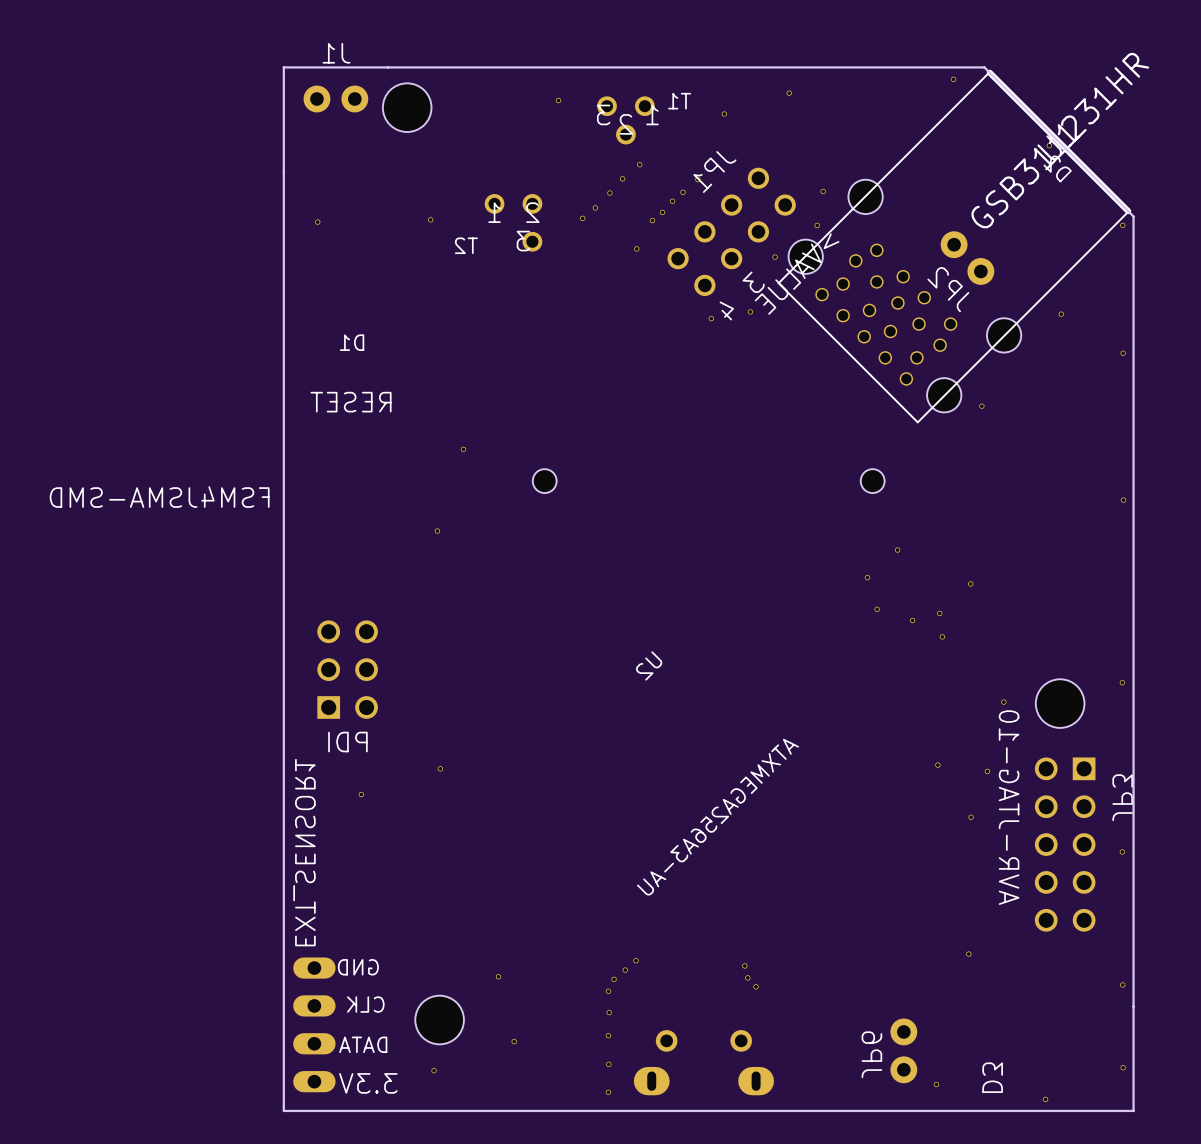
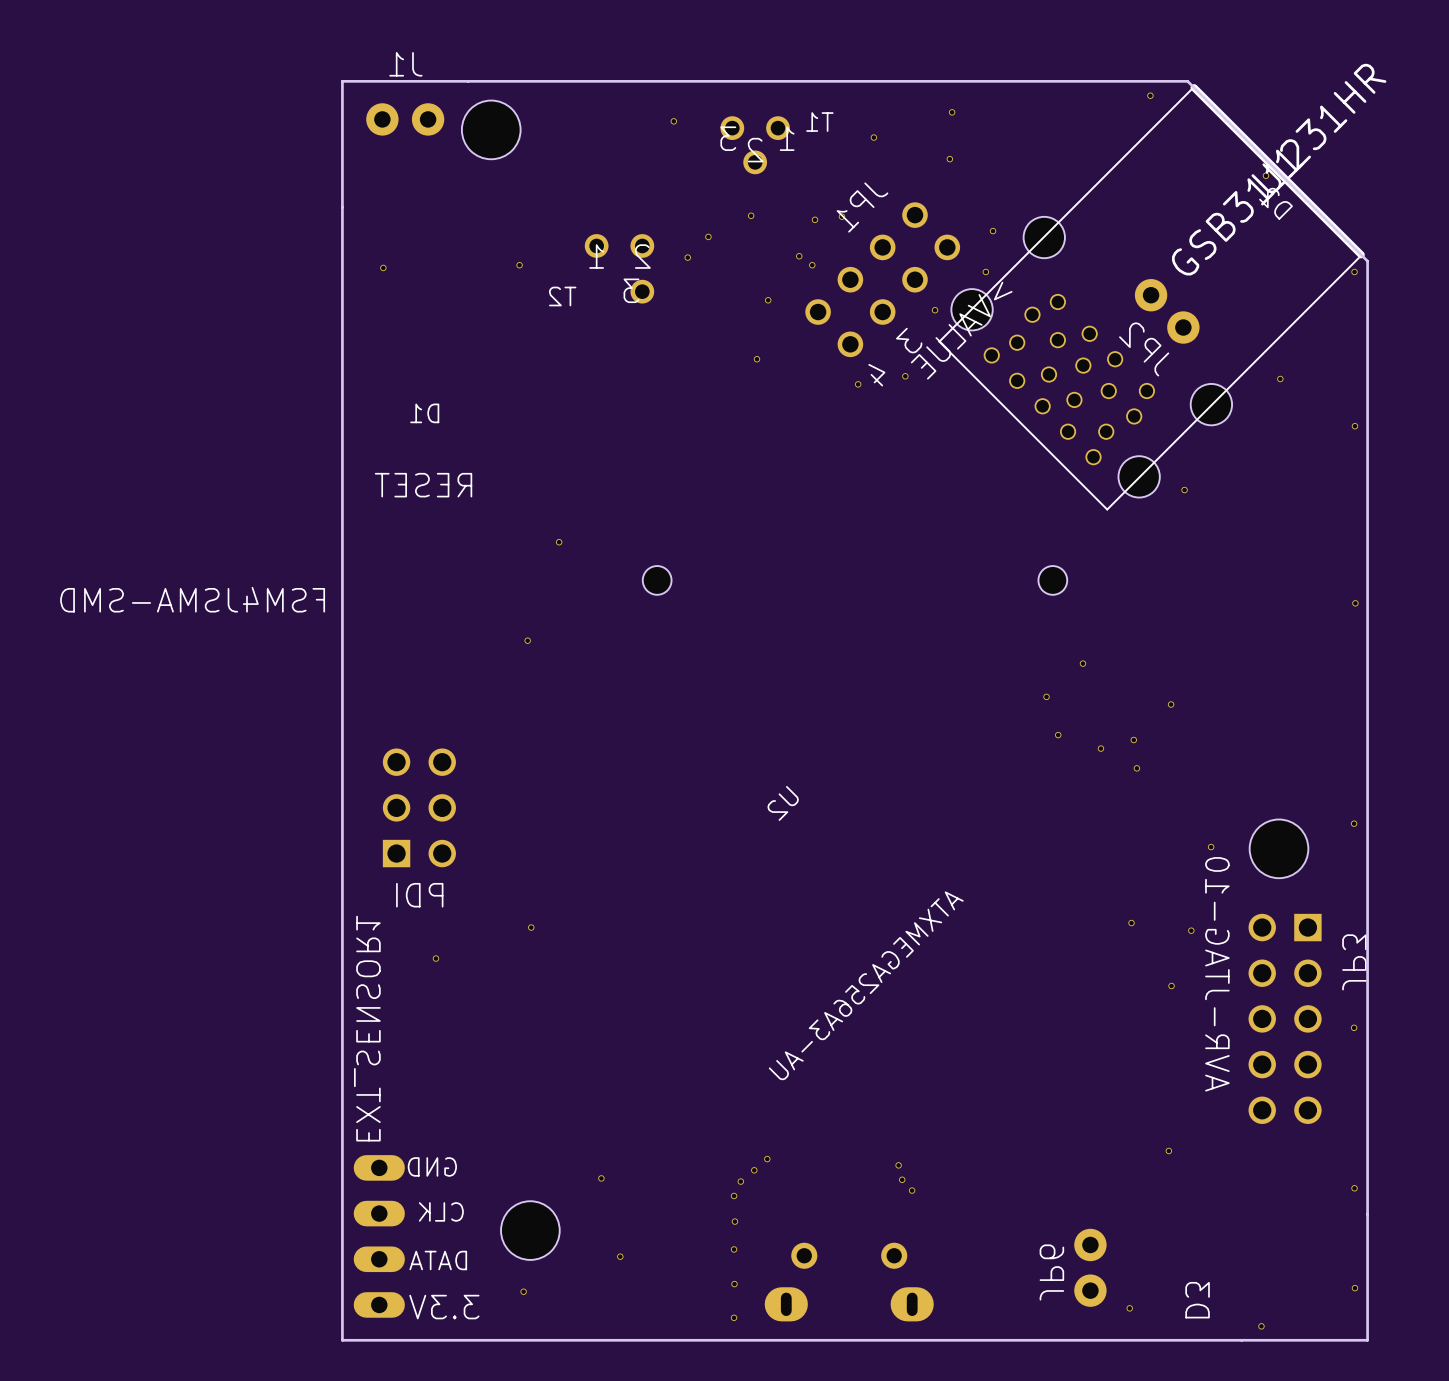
part: none -> (949, 159)
part: (639, 164) -> none
part: none -> (814, 219)
part: (682, 192) -> none
part: (609, 193) -> none
part: none -> (708, 236)
part: (672, 201) -> none
part: (595, 207) -> none
part: none -> (687, 257)
part: (582, 218) -> none
part: none -> (812, 265)
part: (652, 220) -> none
part: none -> (756, 359)

